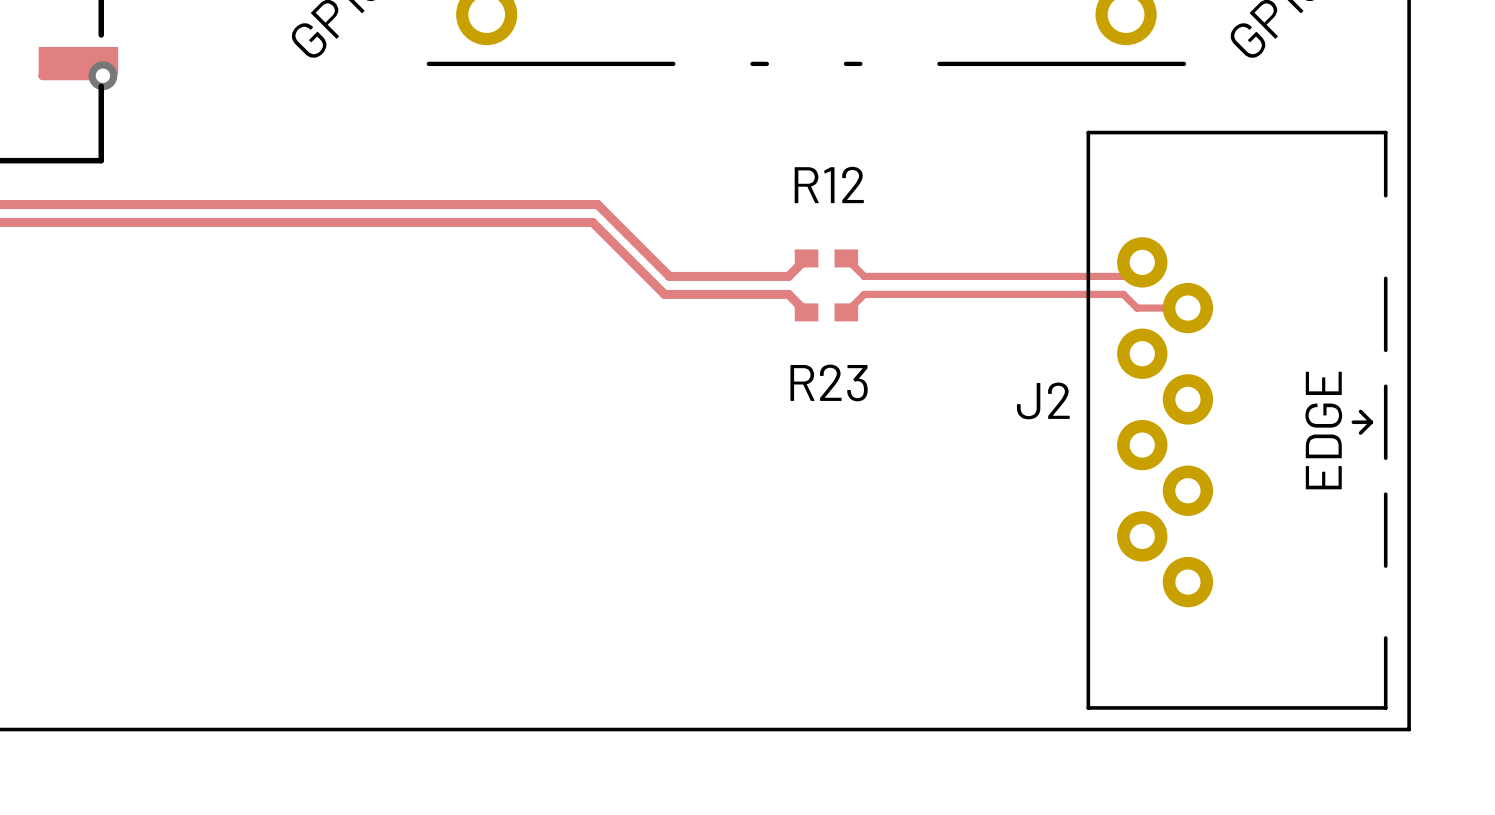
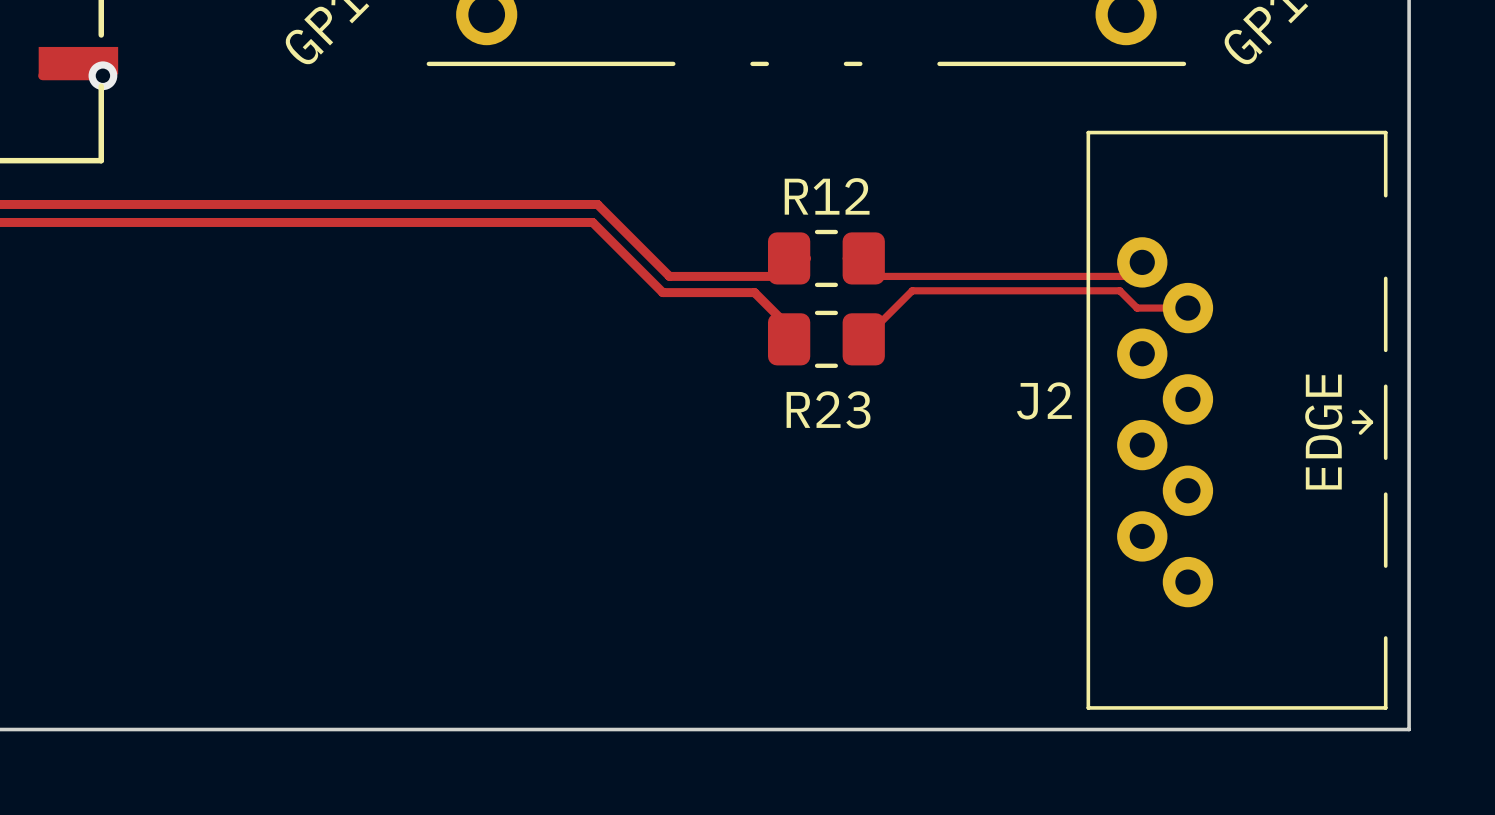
R12 footprint: [794, 249, 859, 268] -> [767, 229, 885, 288]
track: (662, 292) (664, 294) (788, 294) (806, 312) -> (662, 292) (754, 292) (780, 318) (780, 348)
track: (1123, 294) (864, 294) (846, 312) -> (1123, 294) (1119, 290) (912, 290) (863, 339)
R23 footprint: [794, 303, 859, 322] -> [767, 310, 885, 368]

